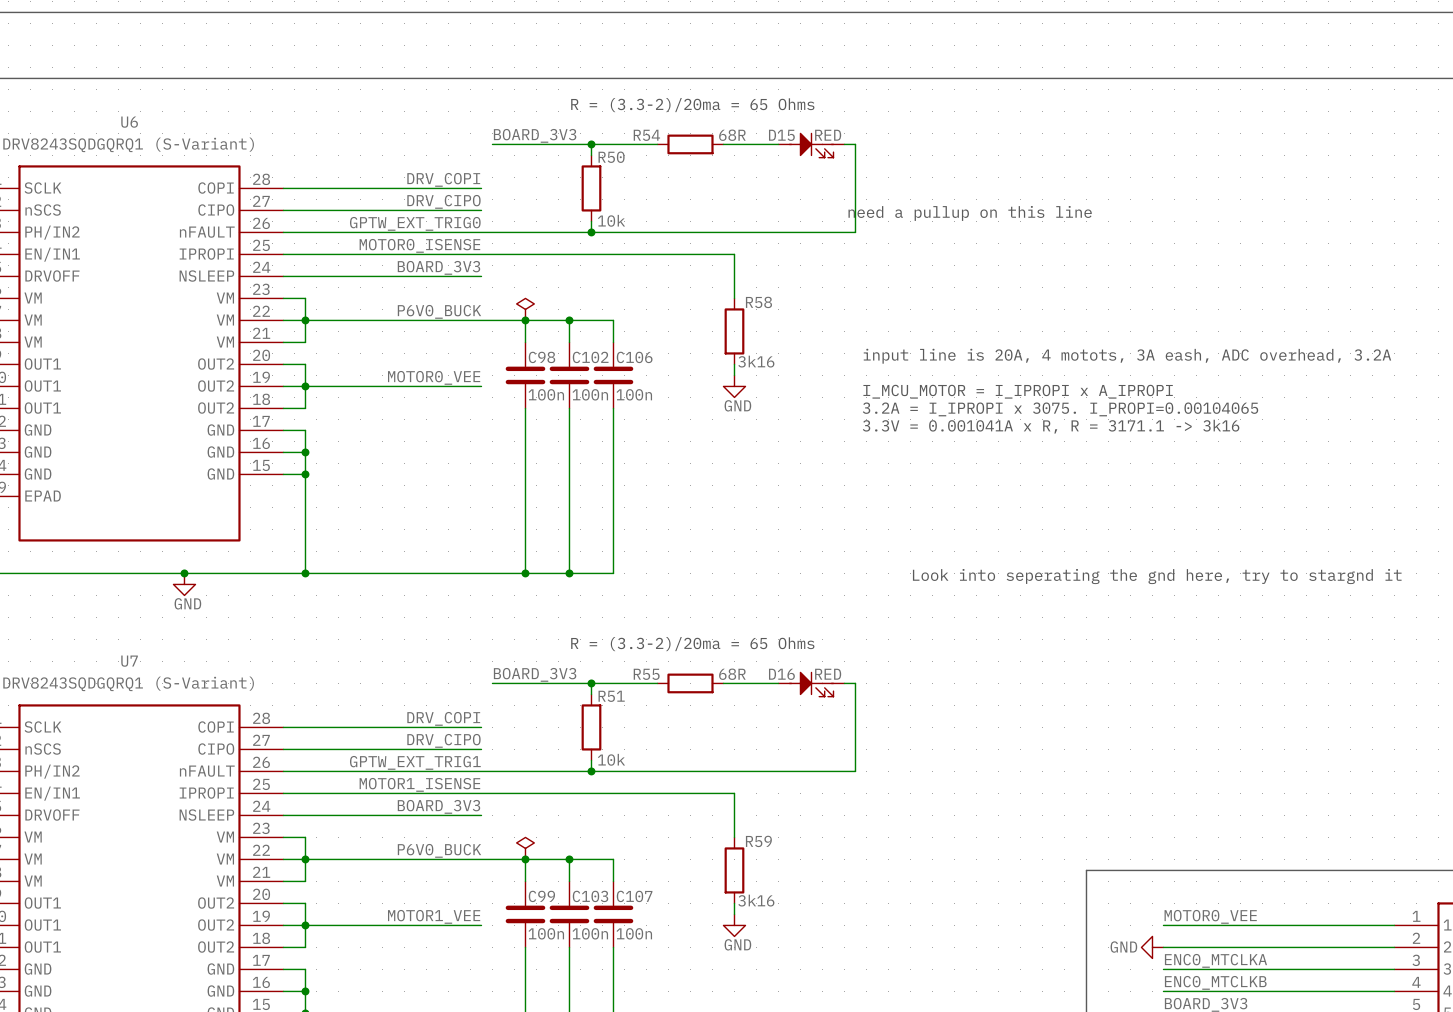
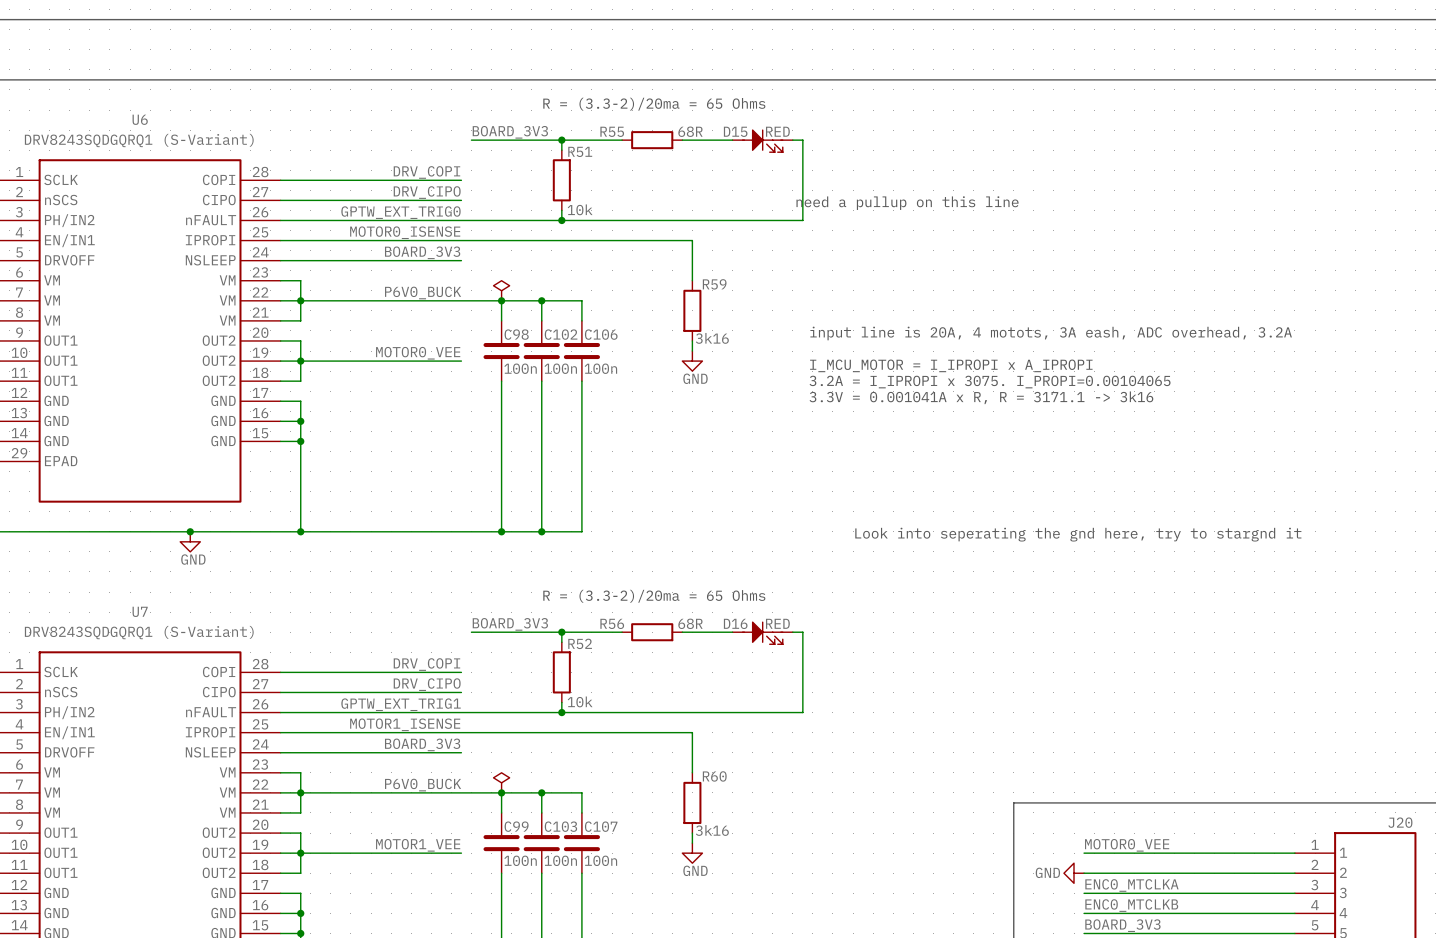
R54 name: R54 (646, 135) -> R55 (612, 131)
R50 name: R50 (611, 157) -> R51 (580, 151)
R58 name: R58 (758, 302) -> R59 (714, 284)
R55 name: R55 (646, 674) -> R56 (612, 623)
R51 name: R51 (611, 696) -> R52 (580, 643)
R59 name: R59 (758, 841) -> R60 (714, 776)

